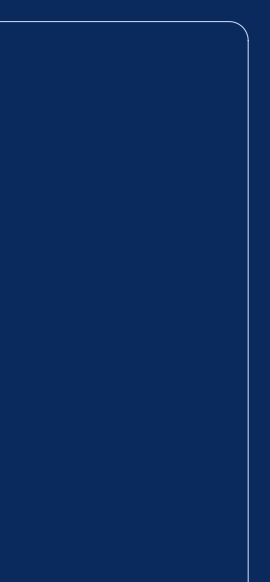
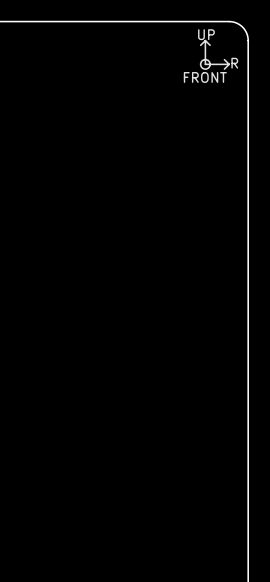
text: none -> UP (206, 34)
line: none -> (205, 40) (205, 64) (229, 64)
line: none -> (205, 40) (200, 45)
line: none -> (205, 40) (210, 45)
drawing: none -> [200, 59, 211, 70]
line: none -> (224, 59) (229, 64)
text: none -> R (234, 63)
line: none -> (229, 64) (224, 69)
text: none -> FRONT (205, 77)

